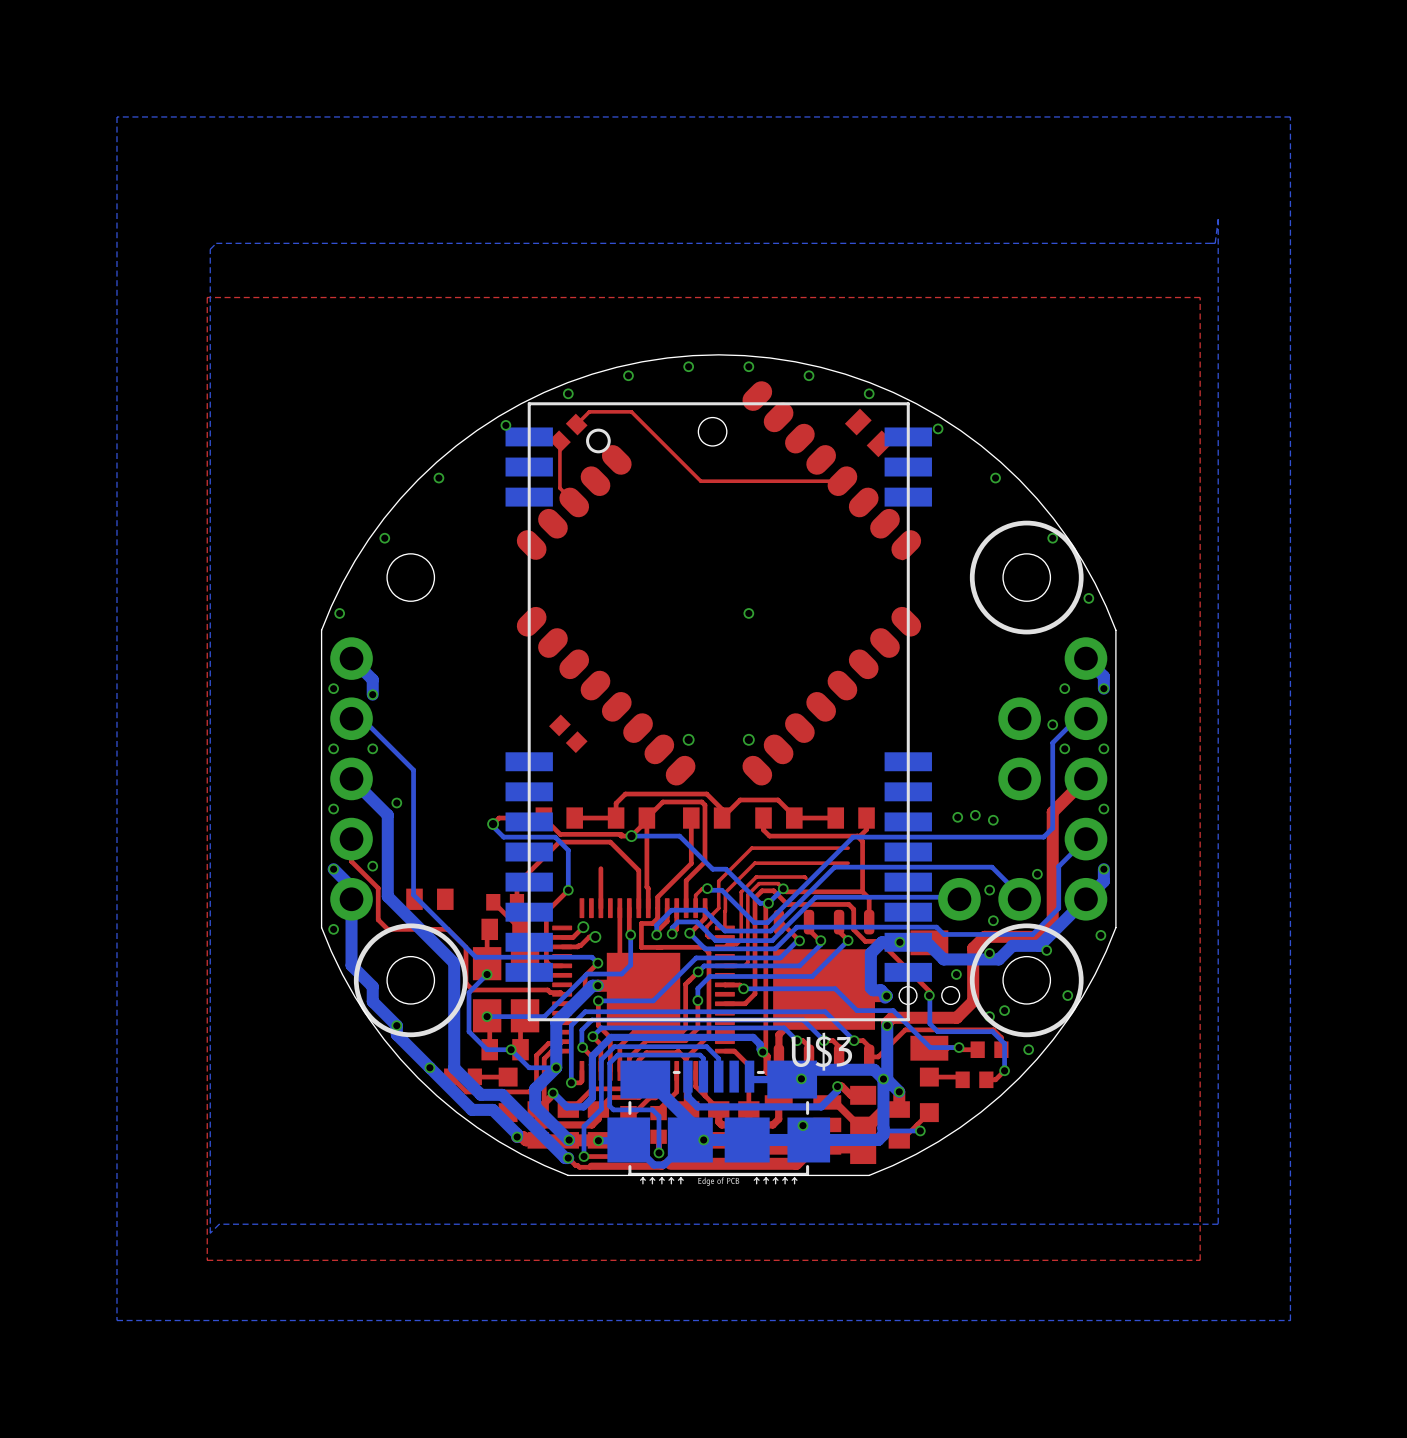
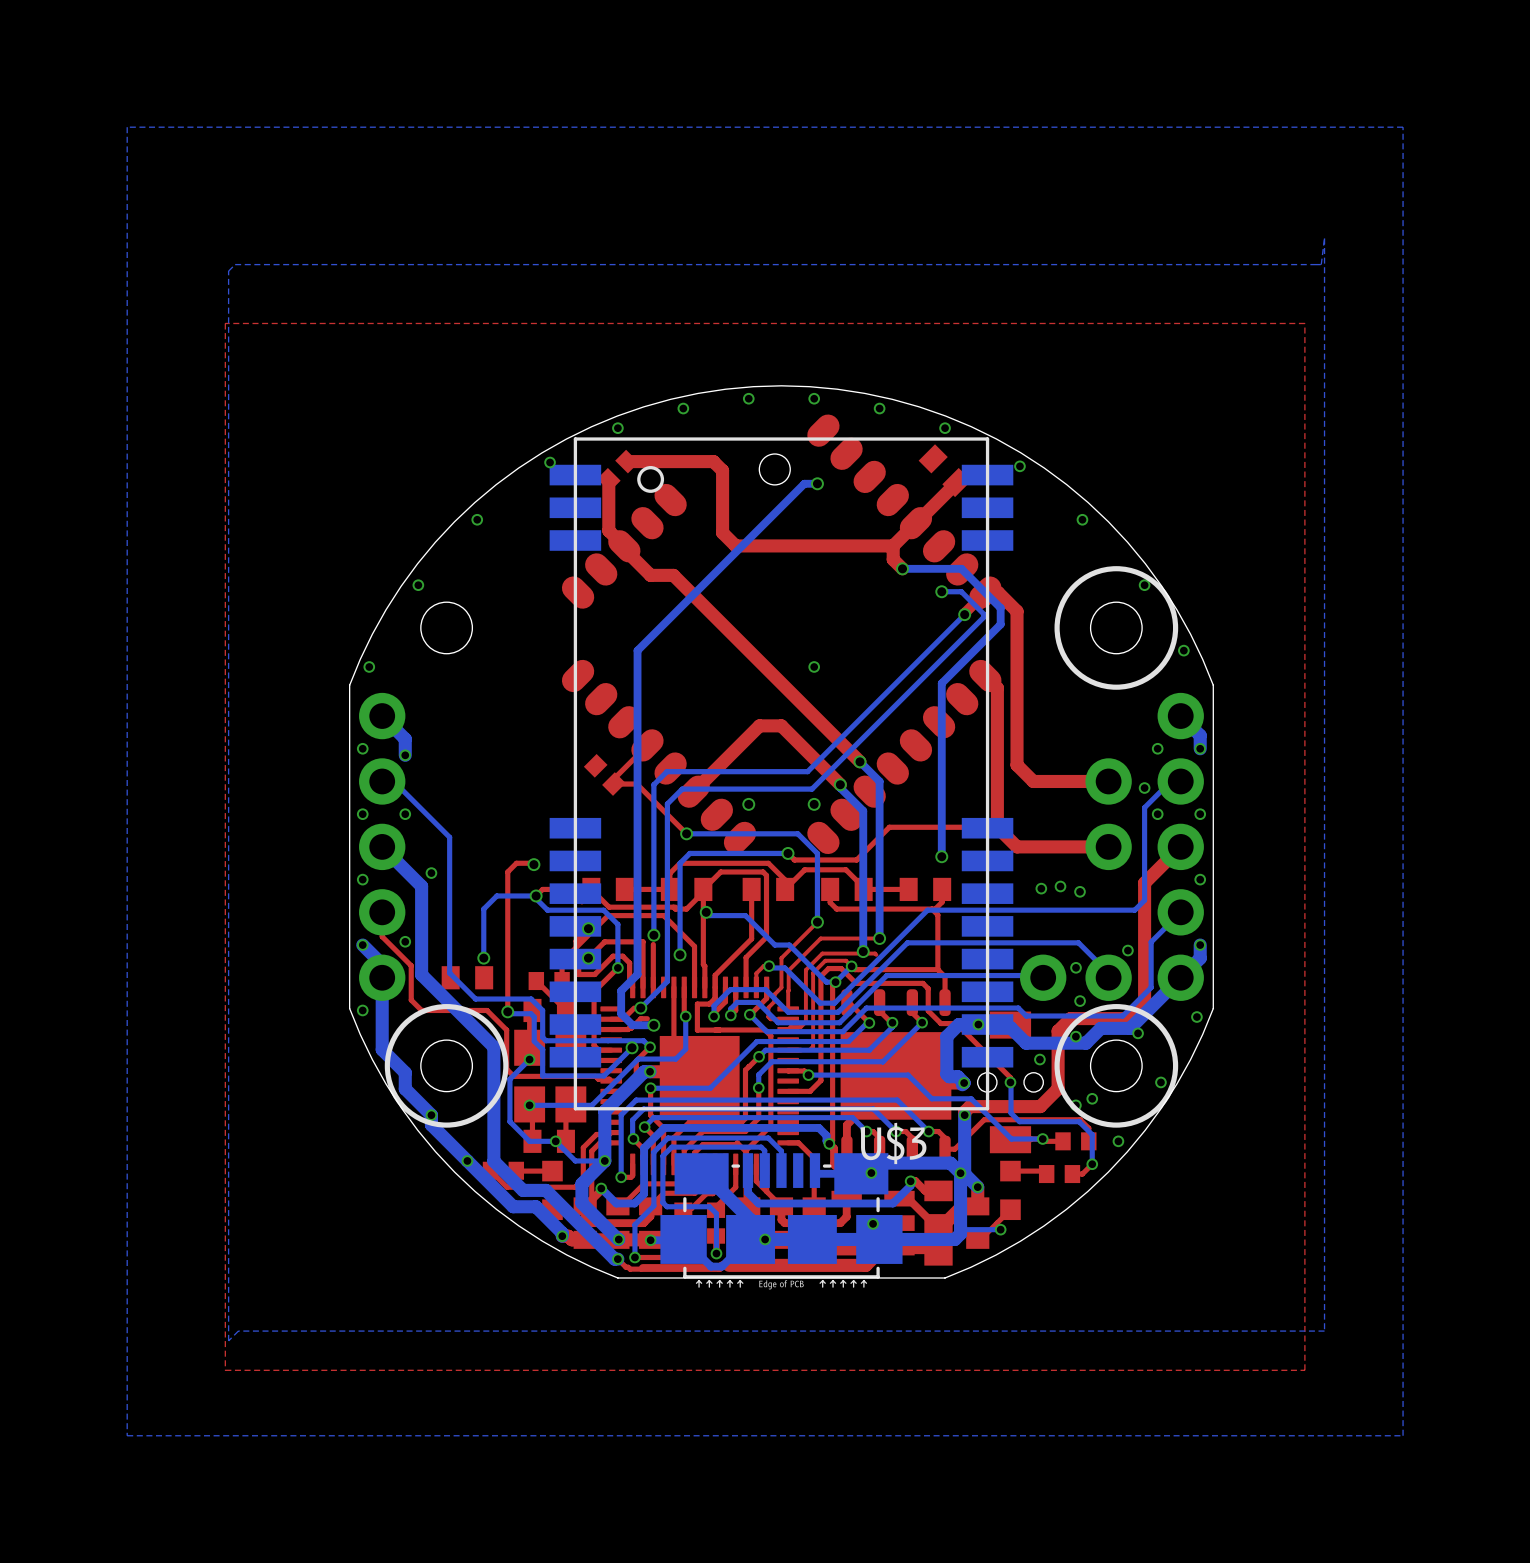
top track: (576, 424) (589, 411) (631, 411) (700, 481) (842, 481) -> (627, 461) (713, 461) (722, 470) (722, 532) (735, 545) (893, 545)
top track width: thin (559, 441) (559, 488) (574, 502) -> thick (608, 479) (608, 530) (624, 546)
bottom track: none -> (817, 483) (804, 483) (637, 650) (637, 974) (621, 990) (621, 1013) (632, 1025) (653, 1025)
via: none -> (817, 483)
top track: none -> (624, 546) (624, 549) (650, 575) (673, 575) (859, 761)
top track: none -> (893, 545) (893, 559) (902, 568)
bottom track: none -> (902, 568) (961, 568) (1000, 608) (1000, 624) (941, 683) (941, 856)
via: none -> (902, 568)
bottom track: none -> (941, 591) (961, 591) (984, 616) (811, 789) (682, 789) (667, 803) (667, 981) (640, 1008)
via: none -> (941, 591)
top track: none -> (964, 614) (985, 592) (998, 592) (1017, 611) (1017, 765) (1033, 781) (1108, 781)
bottom track: none -> (964, 614) (807, 771) (666, 771) (653, 784) (653, 935)
via: none -> (964, 614)
top track: none -> (985, 676) (997, 688) (997, 827)
top track: none -> (647, 745) (613, 778) (613, 784) (636, 784) (686, 833)
bottom track: none -> (859, 761) (879, 781) (879, 938)
via: none -> (859, 761)
top track: none -> (840, 784) (781, 725) (759, 725) (693, 791)
bottom track: none -> (840, 784) (840, 788) (863, 810) (863, 951)
via: none -> (840, 784)
part position: (568, 733) -> (604, 774)
top track: none -> (997, 827) (1017, 846) (1108, 846)
top track: none -> (997, 827) (889, 827) (856, 859) (794, 859) (788, 853)
bottom track: none -> (686, 833) (797, 833) (817, 853) (817, 922)
via: none -> (686, 833)
bottom track: none -> (788, 853) (689, 853) (680, 863) (680, 954)
via: none -> (788, 853)
via: none -> (941, 856)
top track: none -> (533, 864) (516, 863) (507, 871) (507, 1011)
via: none -> (533, 864)
bottom track: none -> (536, 895) (496, 895) (483, 909) (483, 958)
bottom track: (631, 836) (679, 836) (685, 842) -> (706, 912) (709, 915) (745, 915)
via position: (631, 836) -> (706, 912)
via: none -> (817, 922)
top track: (848, 848) (751, 848) -> none
top track: none -> (588, 928) (576, 941) (576, 963) (578, 965) (578, 974) (594, 974) (613, 956) (622, 956) (629, 963) (629, 984) (632, 987)
via: none -> (588, 928)
via: none -> (653, 935)
via: none -> (879, 938)
top track: (848, 863) (809, 863) -> none
via: none -> (863, 951)
via: none -> (680, 954)
via: none -> (483, 958)
top track: none -> (588, 958) (604, 941) (643, 941) (643, 987)
via: none -> (588, 958)
bottom track: (437, 918) (475, 957) (502, 957) -> (475, 999) (531, 999) (542, 1010) (542, 1037) (545, 1040)
via: (583, 927) -> none
via: none -> (640, 1008)
bottom track: none -> (507, 1011) (507, 1013) (530, 1013) (534, 1017) (534, 1041) (542, 1049)
via: none -> (507, 1011)
via: (595, 936) -> none
via: none -> (653, 1025)
bottom track: none -> (632, 1047) (603, 1075) (542, 1075) (542, 1049)
via: none -> (632, 1047)

